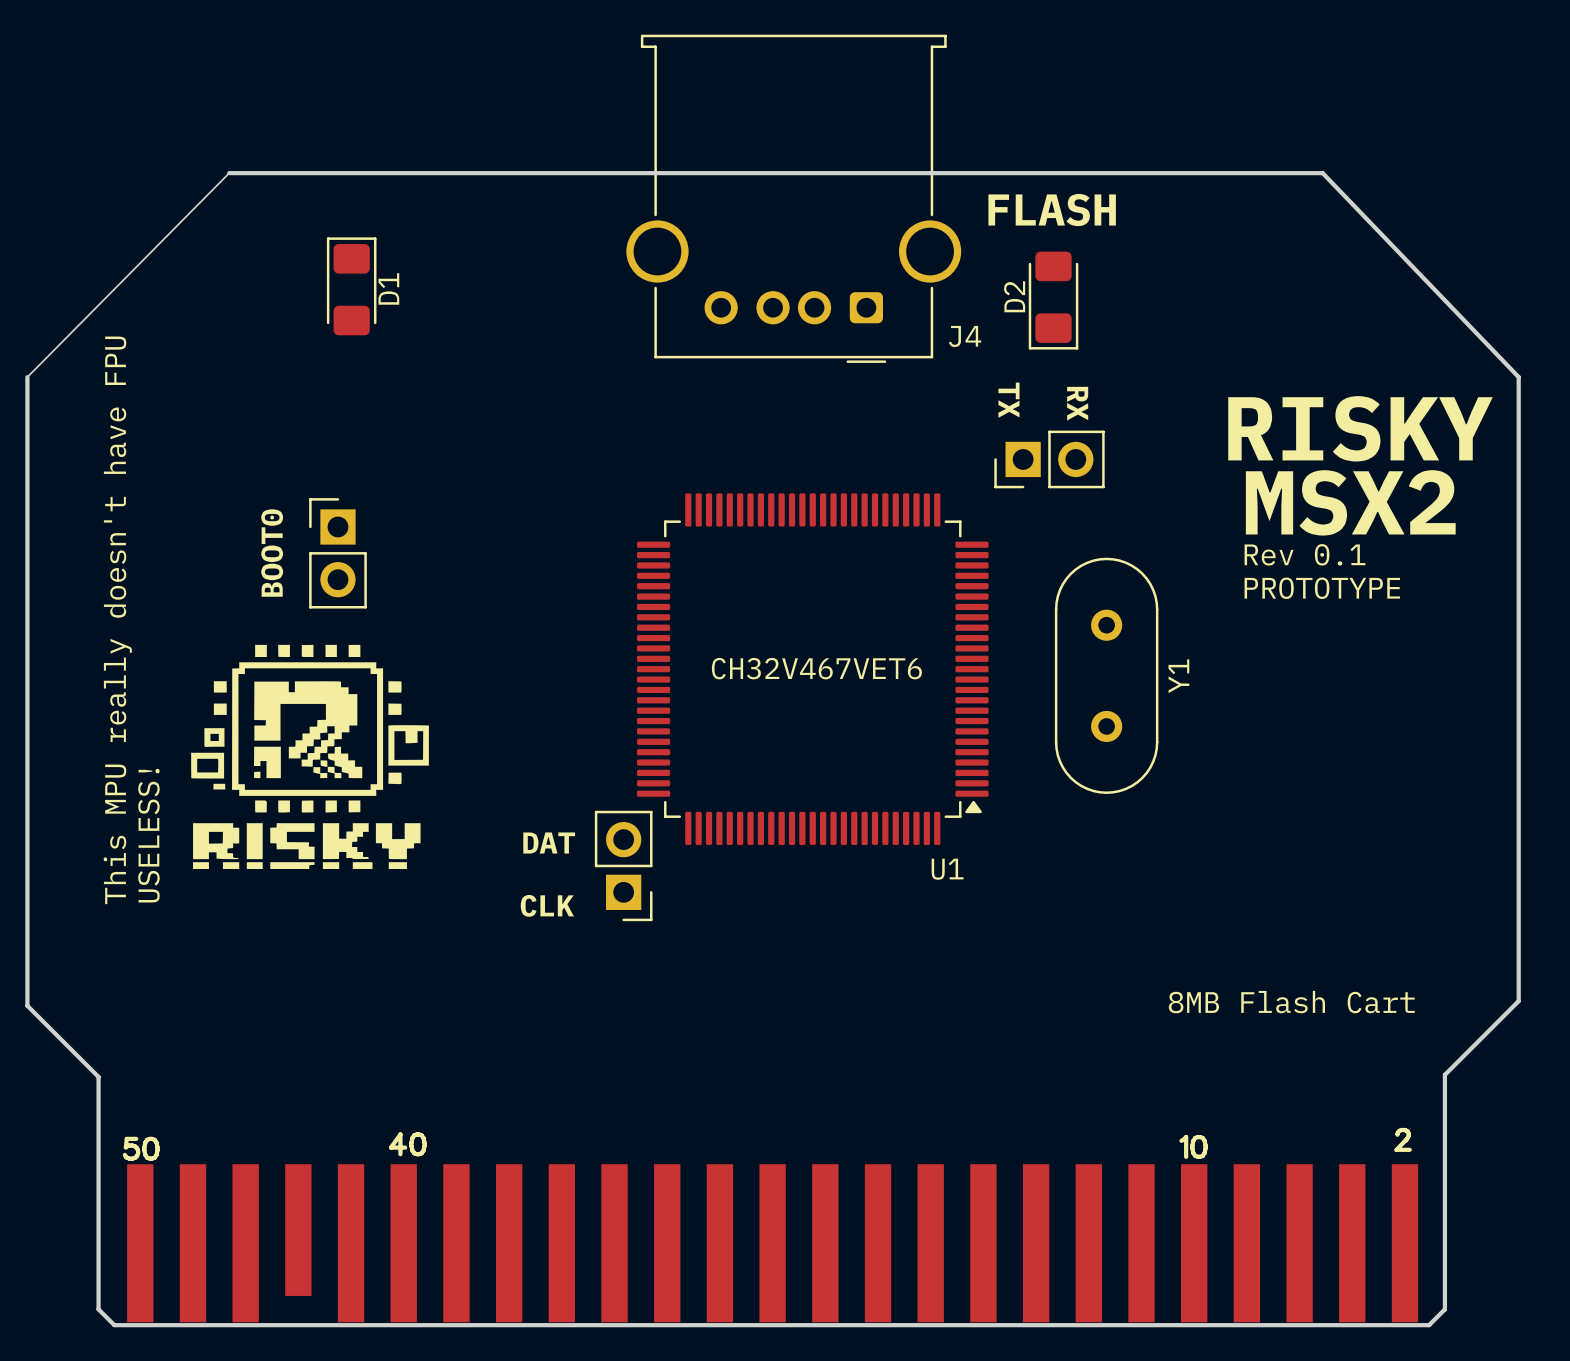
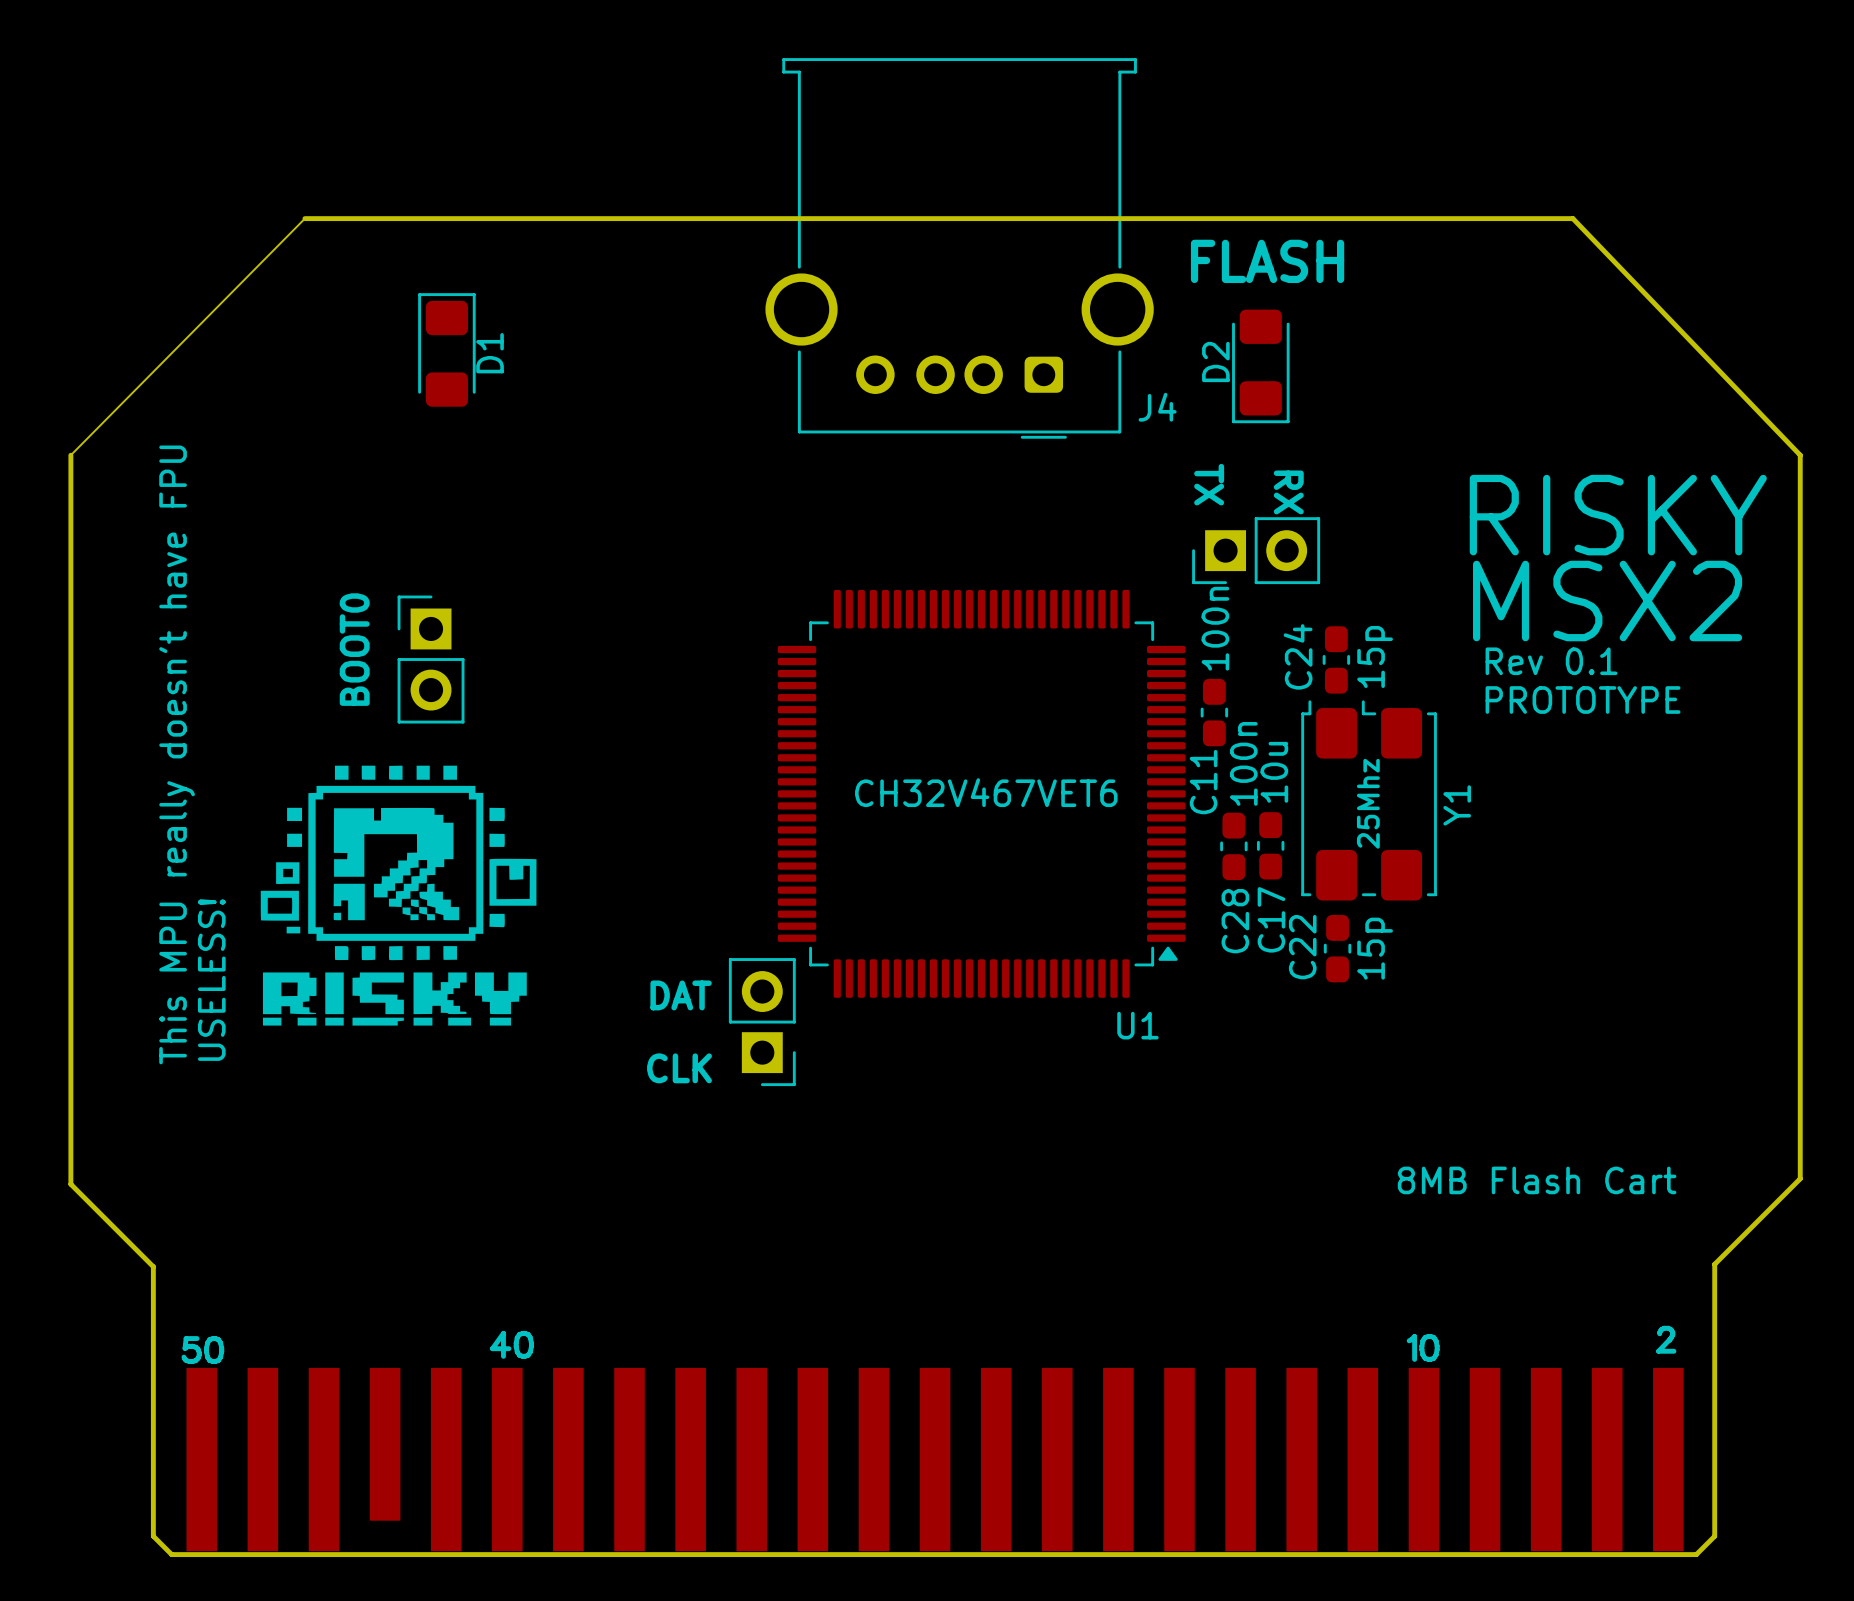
C24: none -> 15p (1336, 659)
Y1 footprint: [1054, 557, 1159, 794] -> [1301, 700, 1437, 901]
C11: none -> 100n (1214, 712)
Y1 value: none -> 25Mhz (1368, 803)
C28: none -> 100n (1233, 846)
C17: none -> 10u (1270, 845)
C22: none -> 15p (1337, 948)

